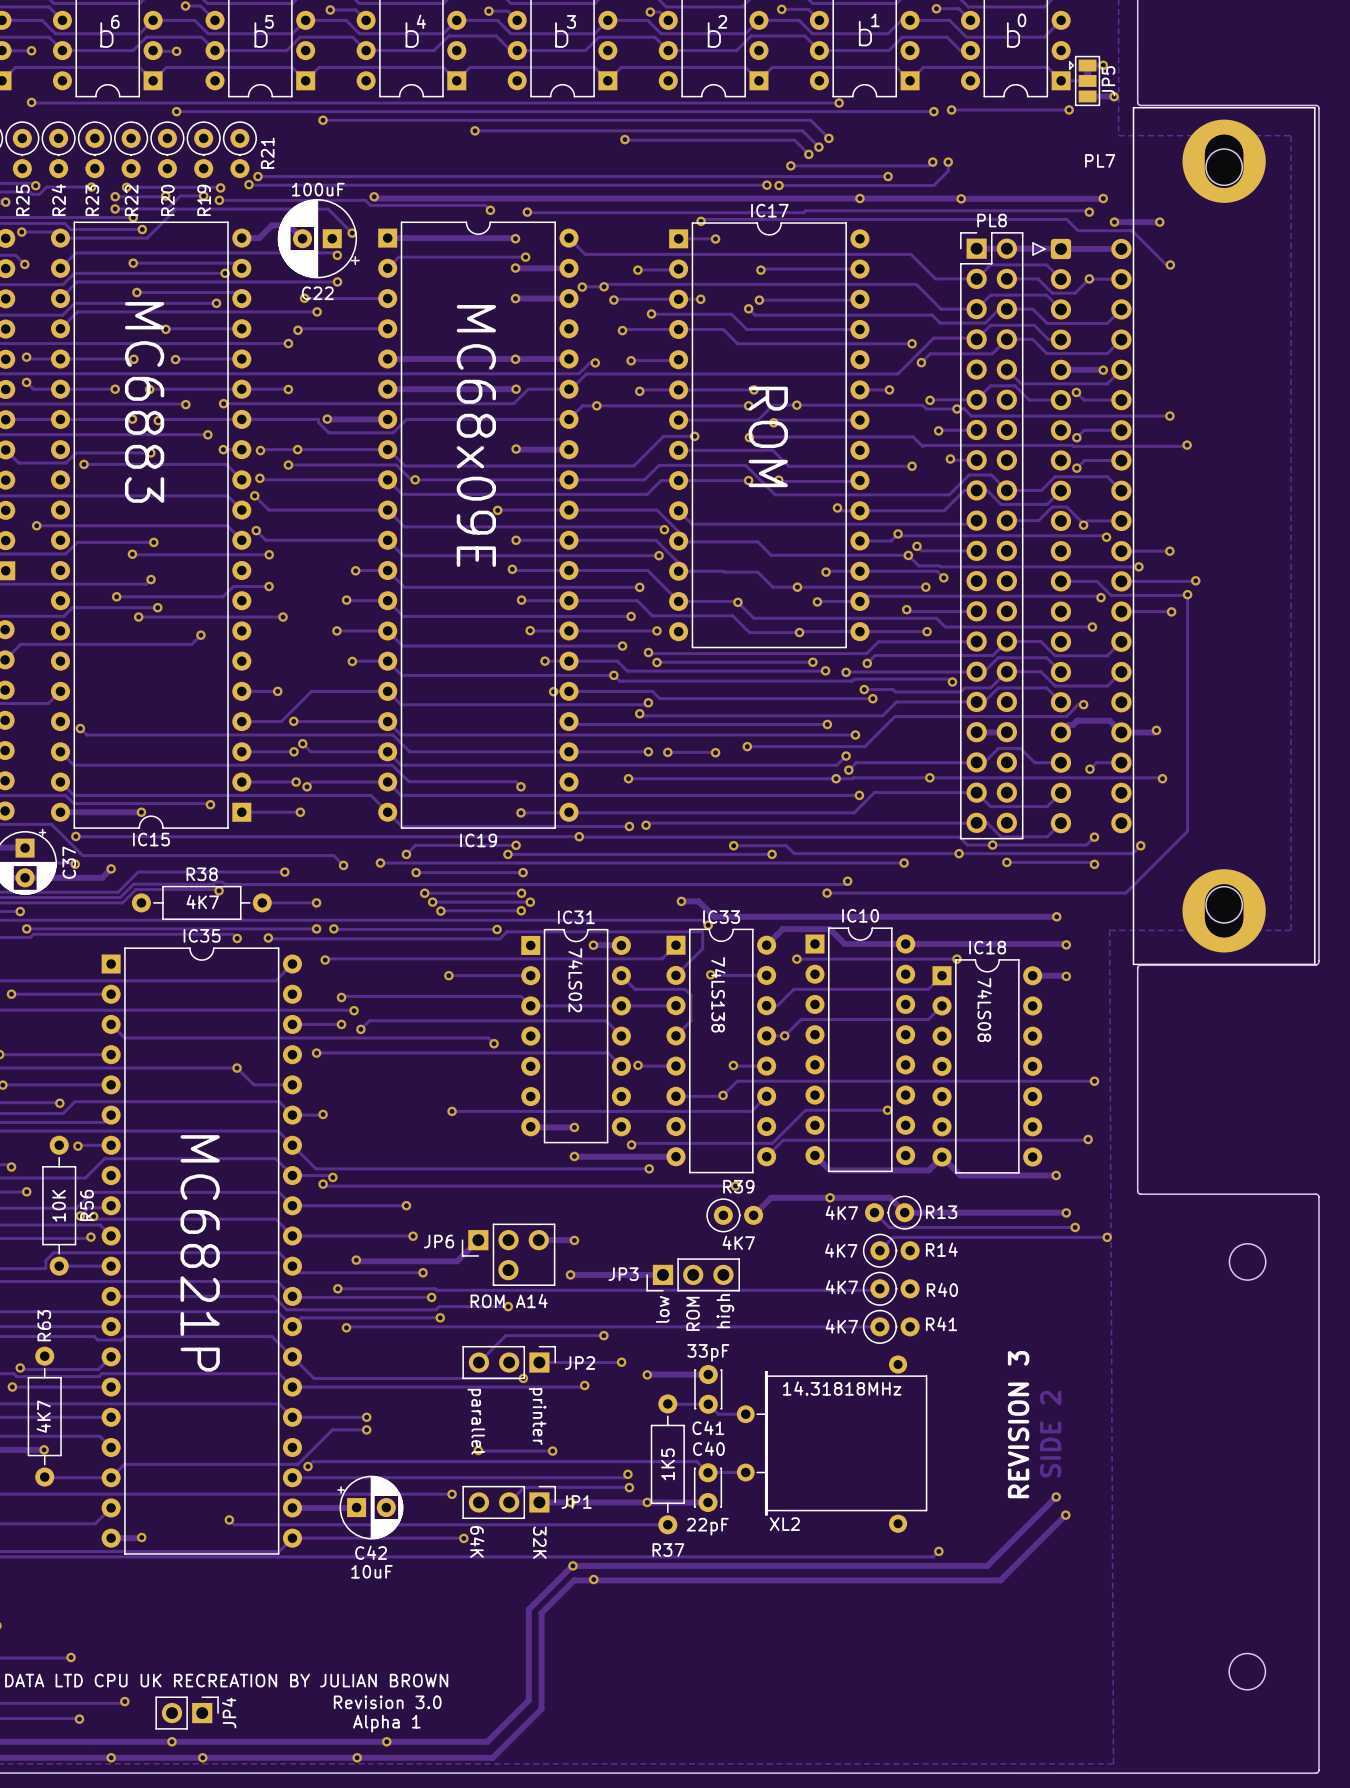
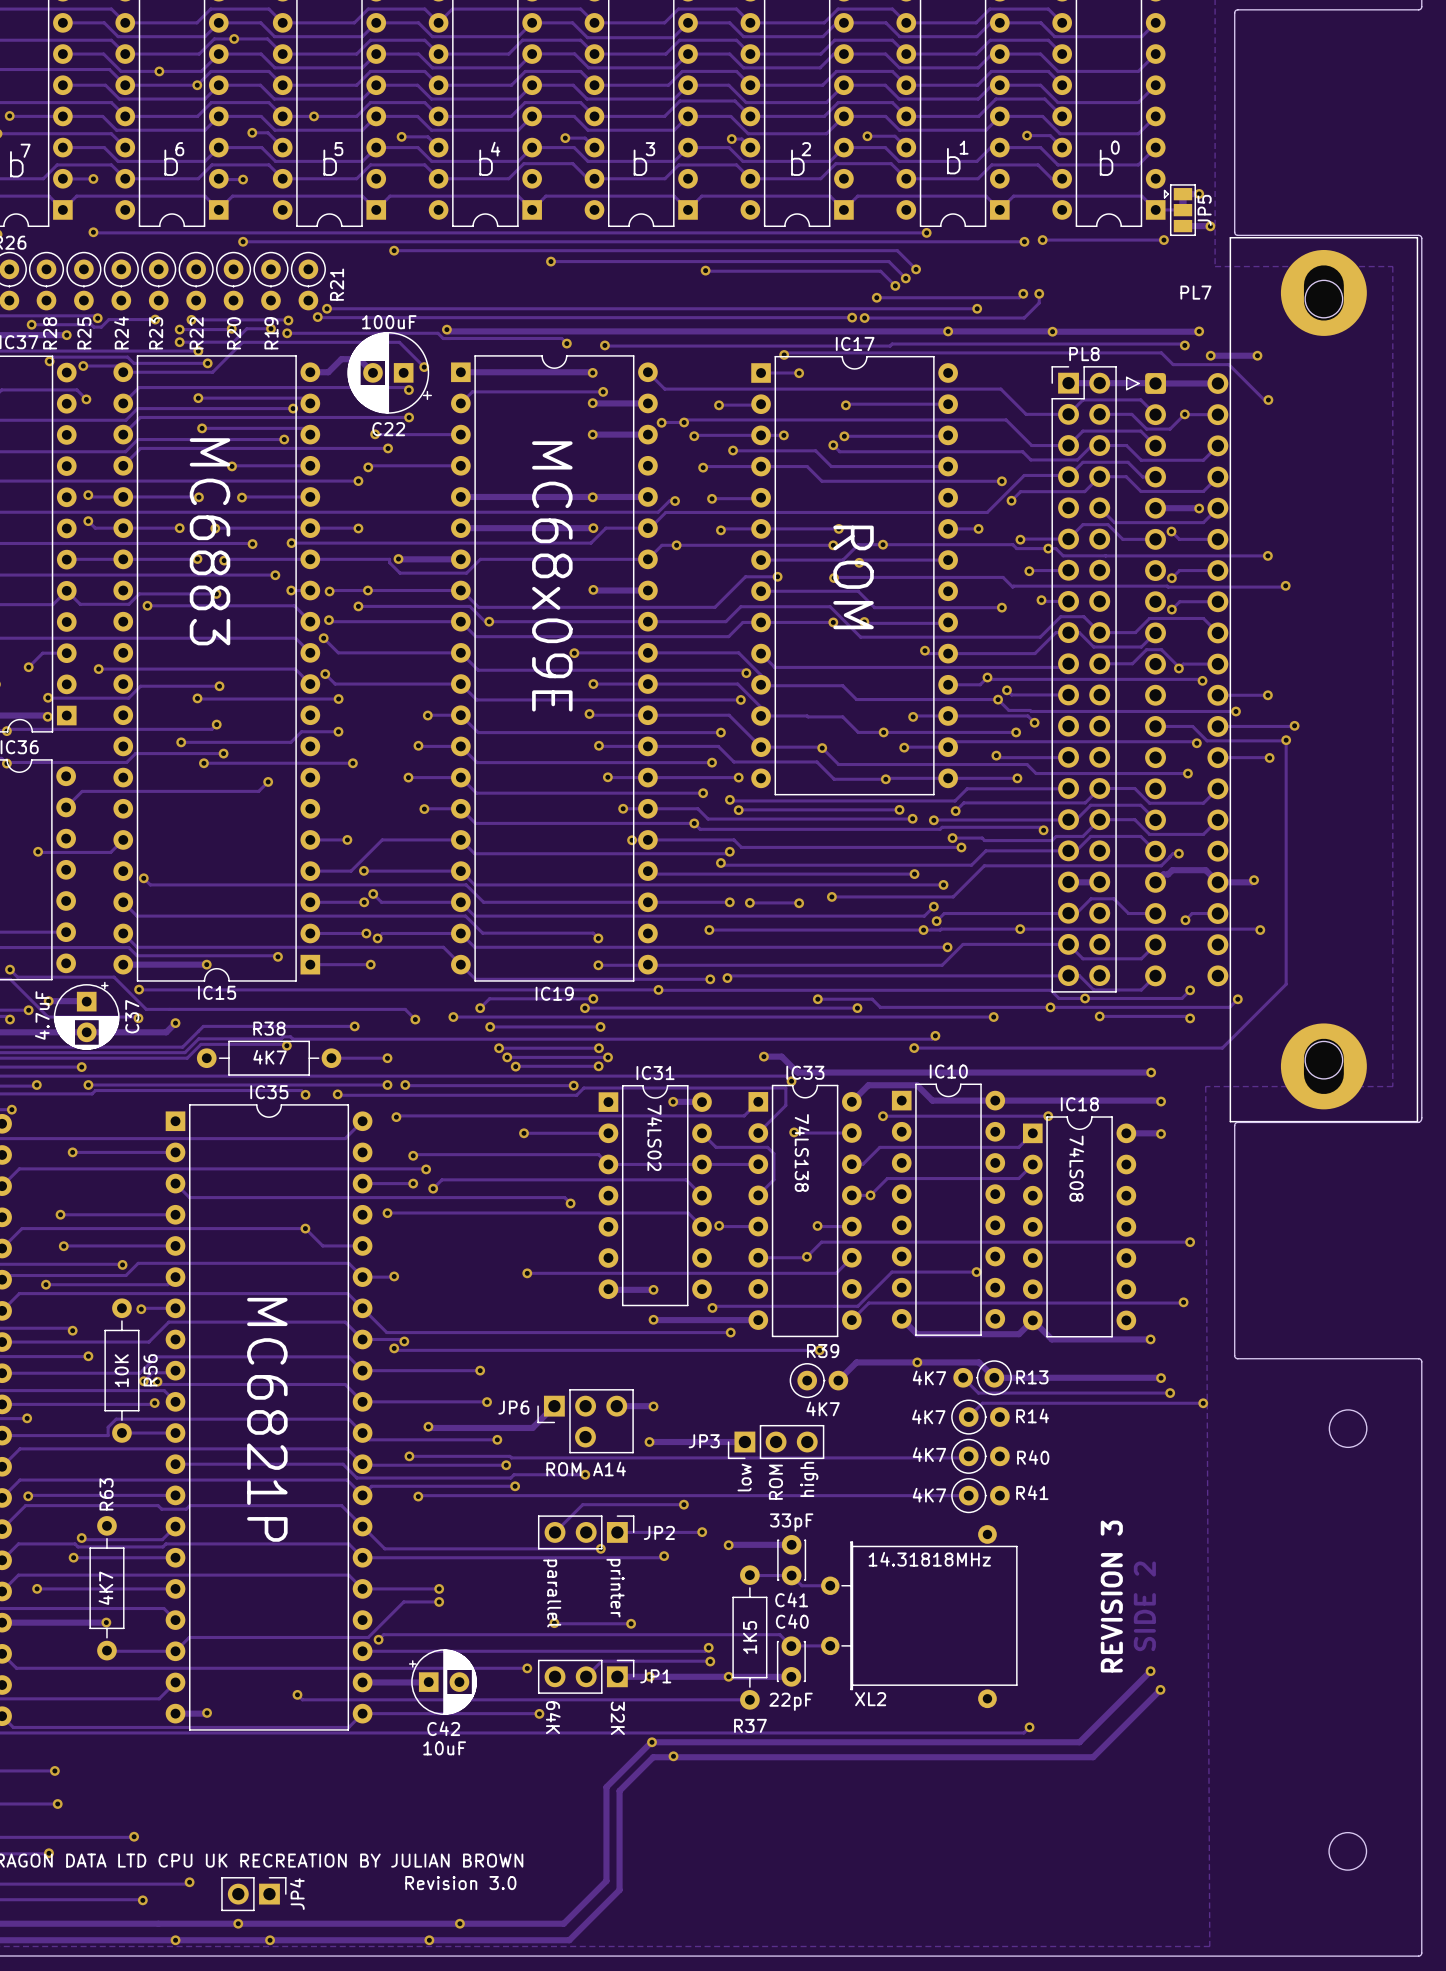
text: Alpha 1 (386, 1723) -> none

